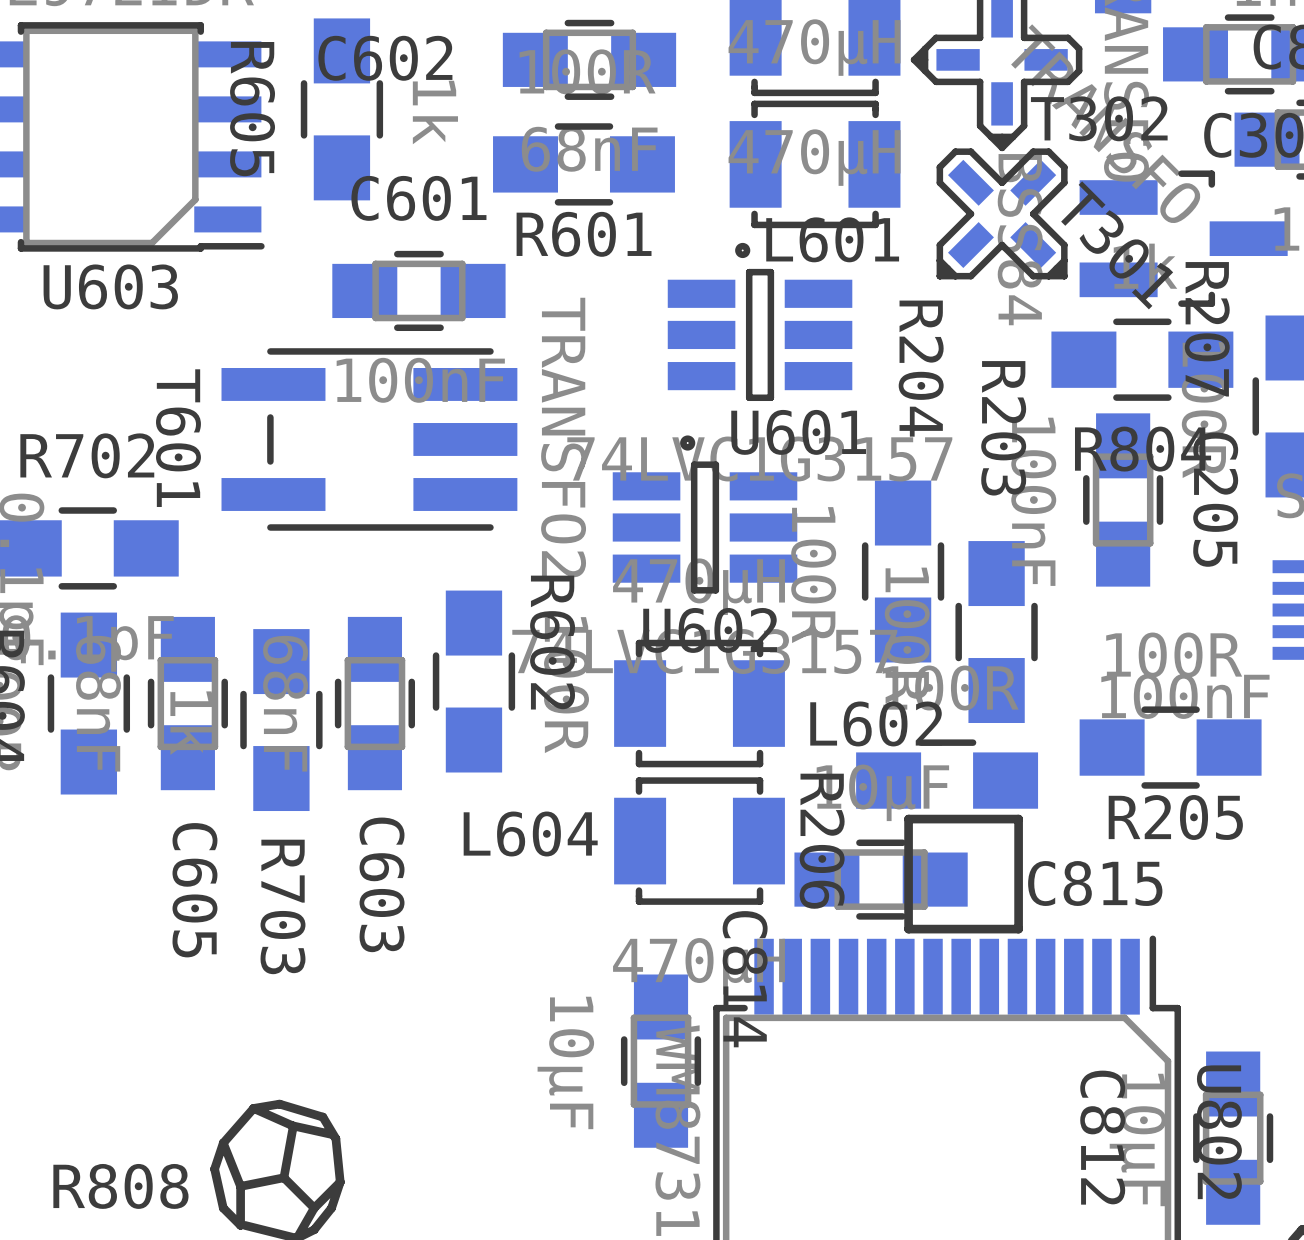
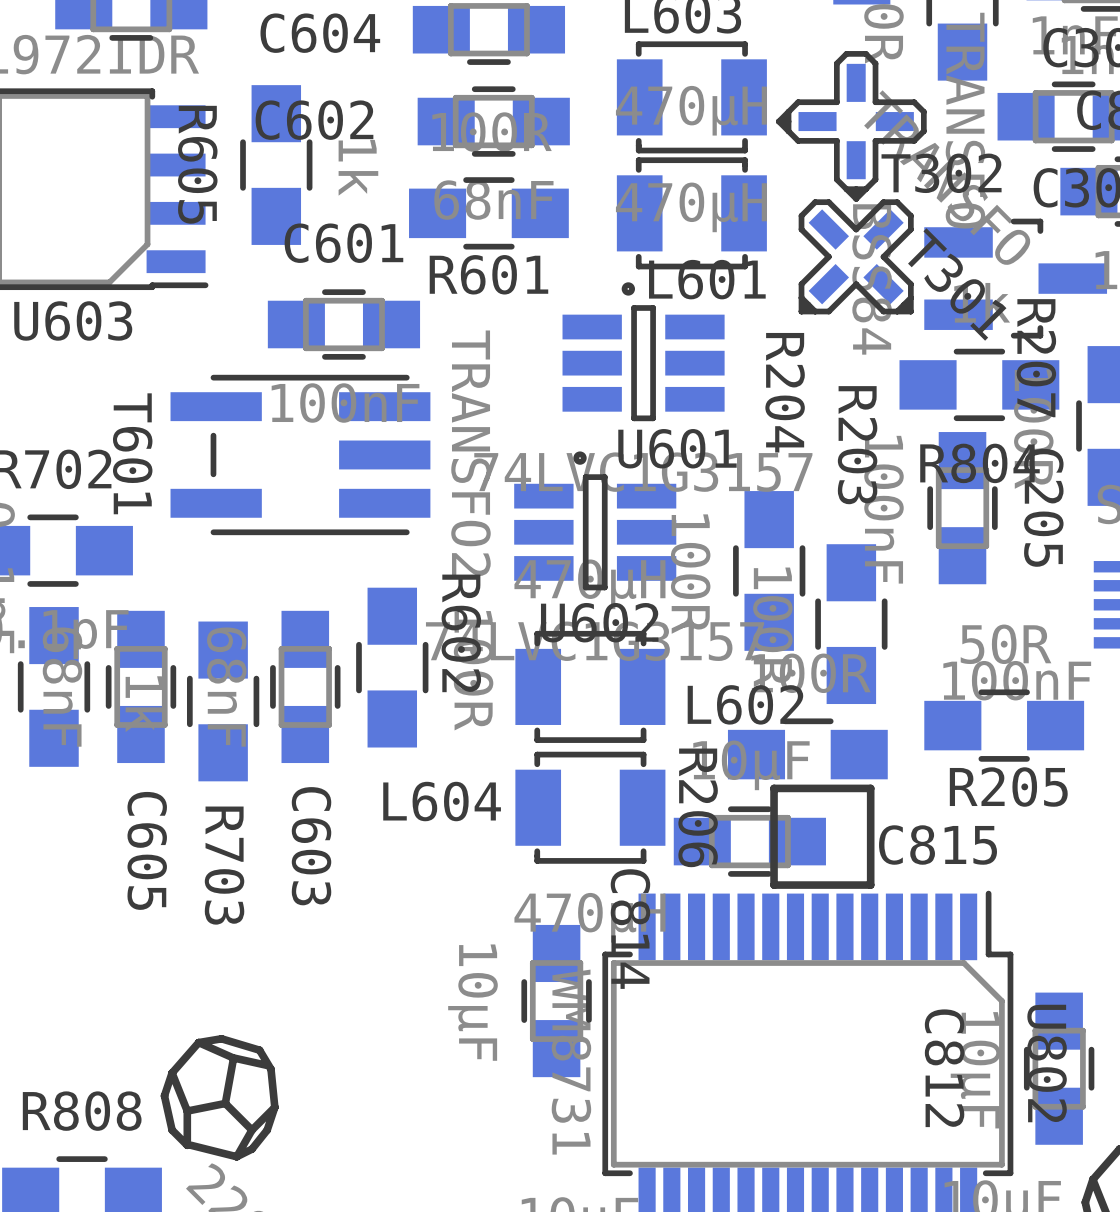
R205 value: 100R (1174, 655) -> 50R (1006, 644)

